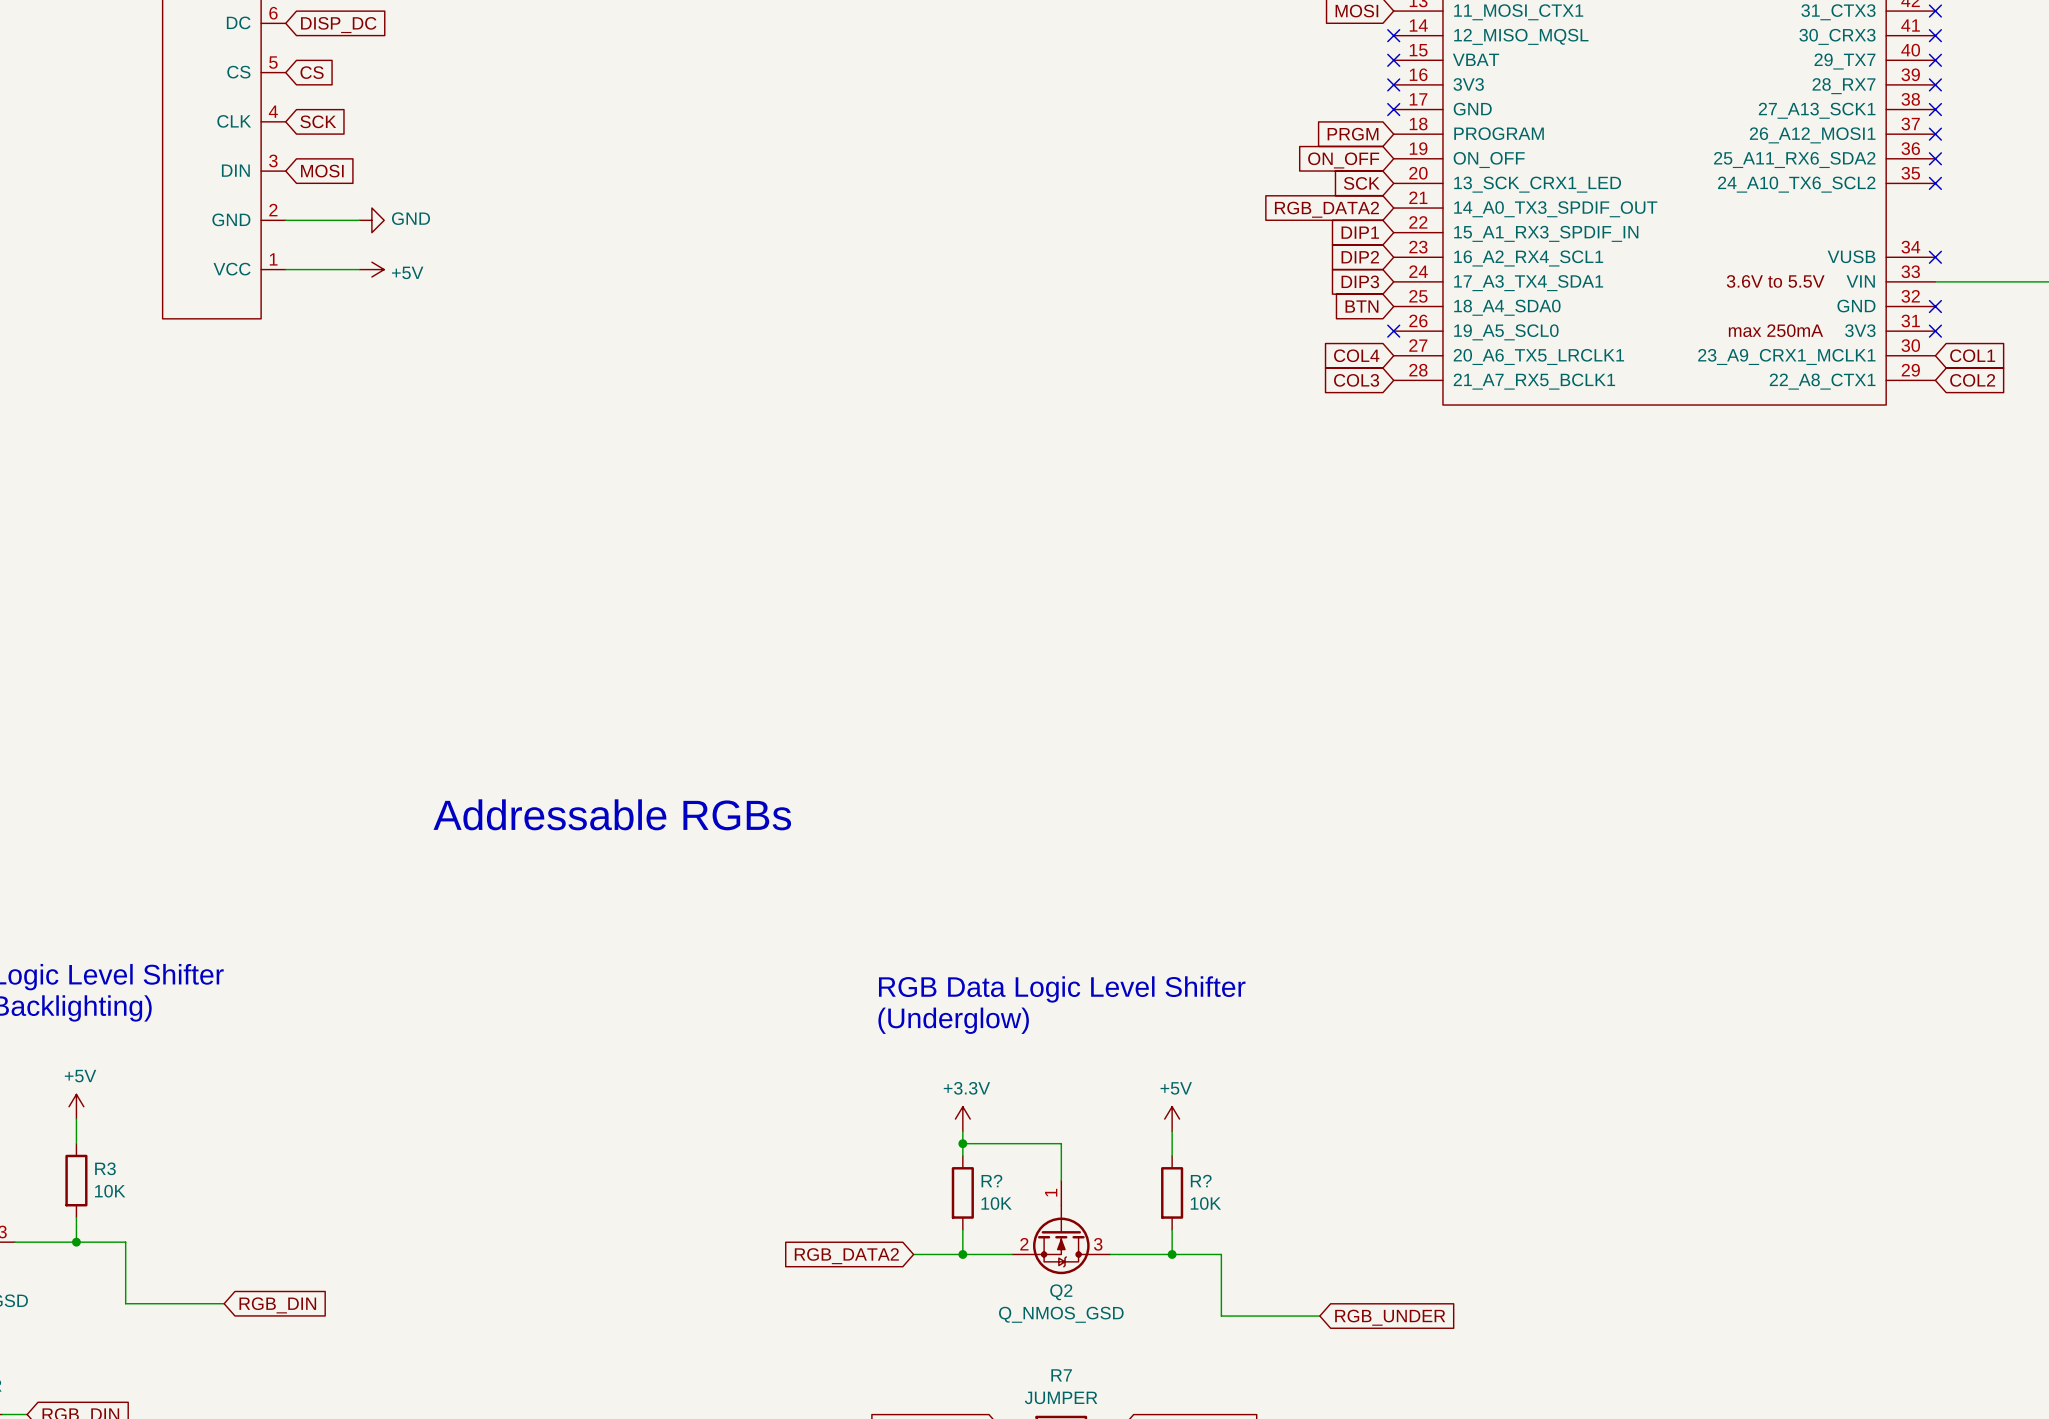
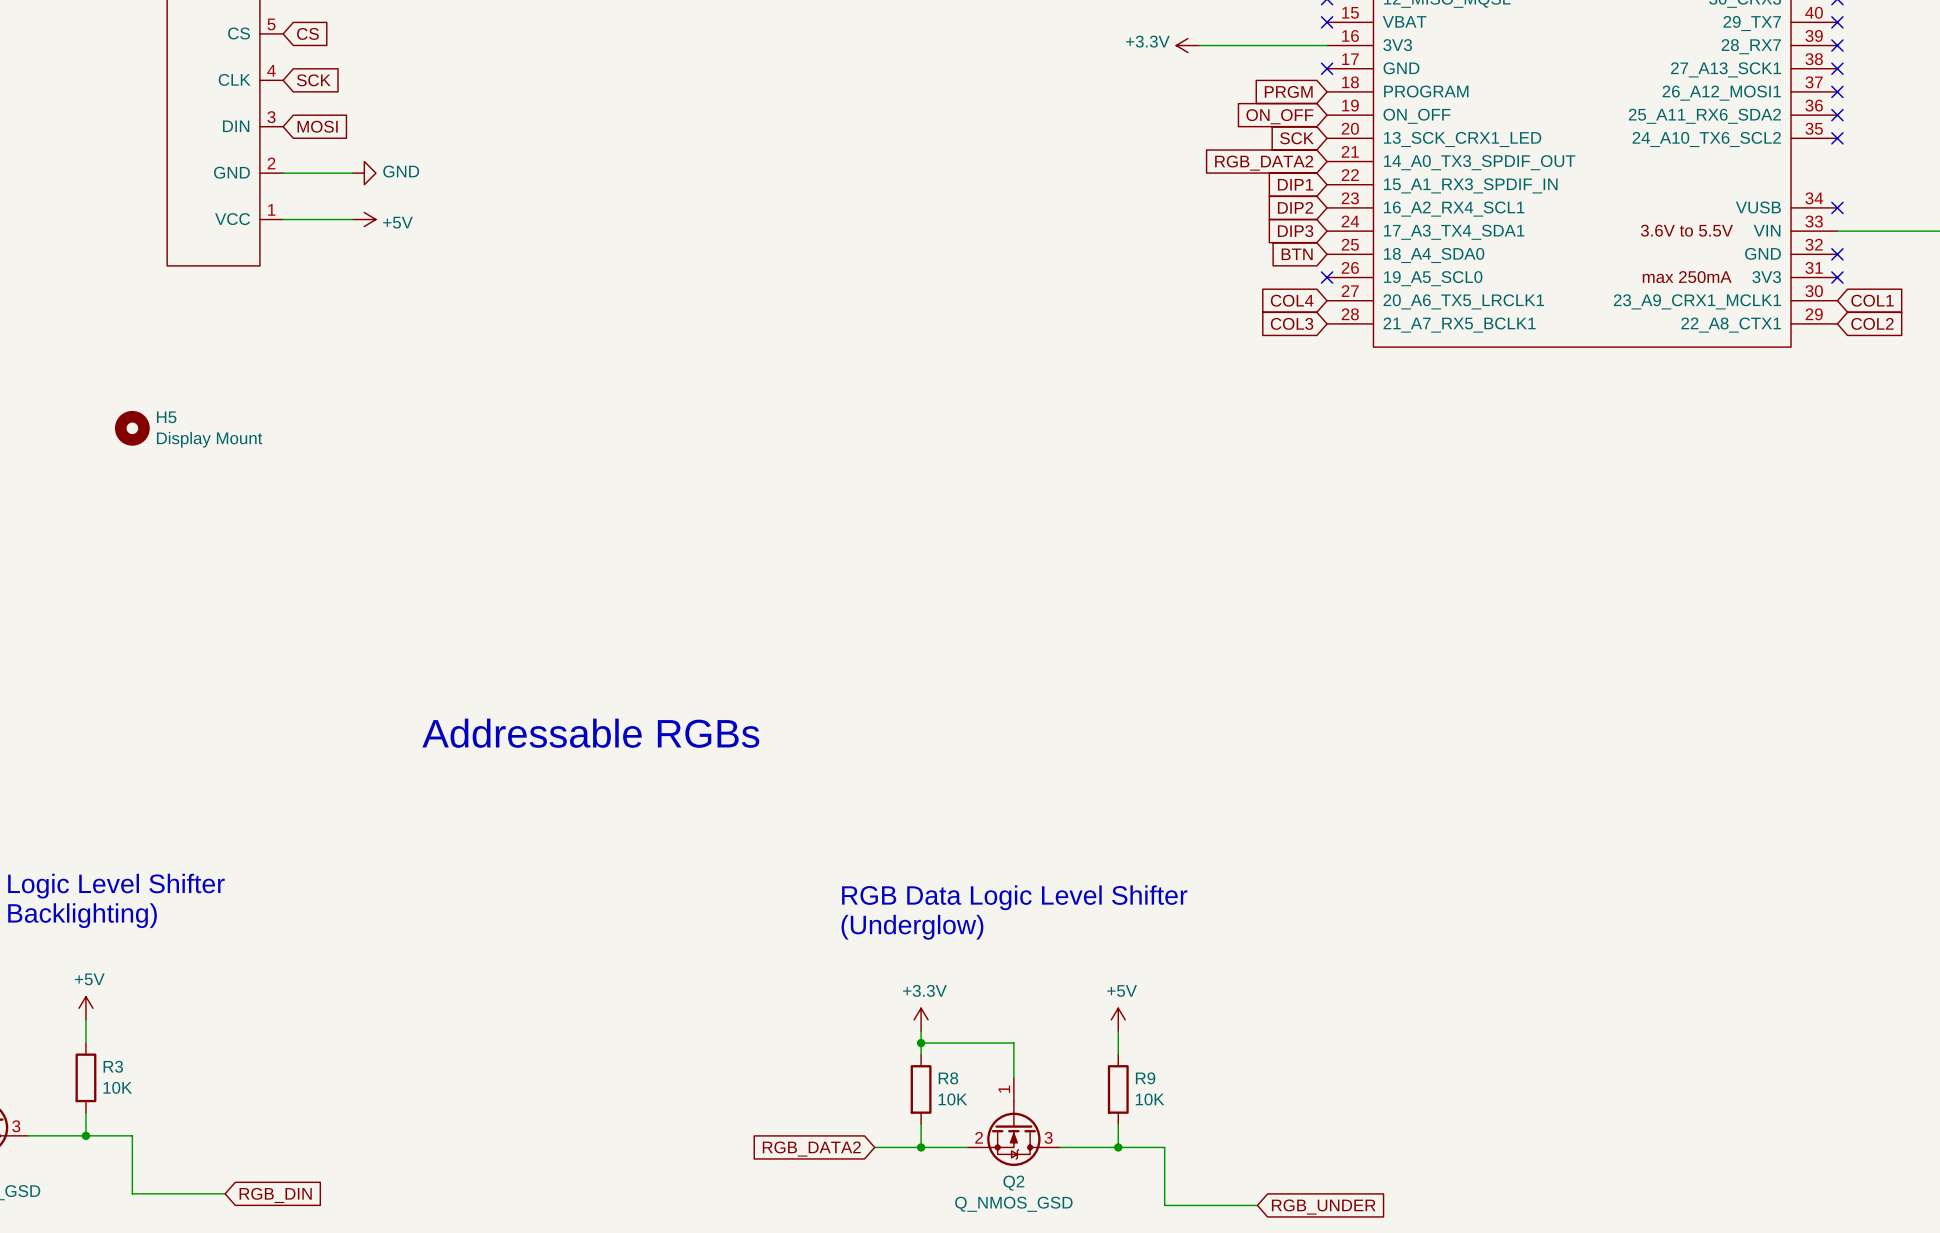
power symbol: none -> +3.3V (1187, 45)
wire: none -> (1199, 45) (1327, 45)
no-connect mark: (1393, 84) -> none
H5: none -> Display Mount (132, 428)
R? name: R? (991, 1181) -> R8 (948, 1078)
R? name: R? (1201, 1181) -> R9 (1145, 1078)

